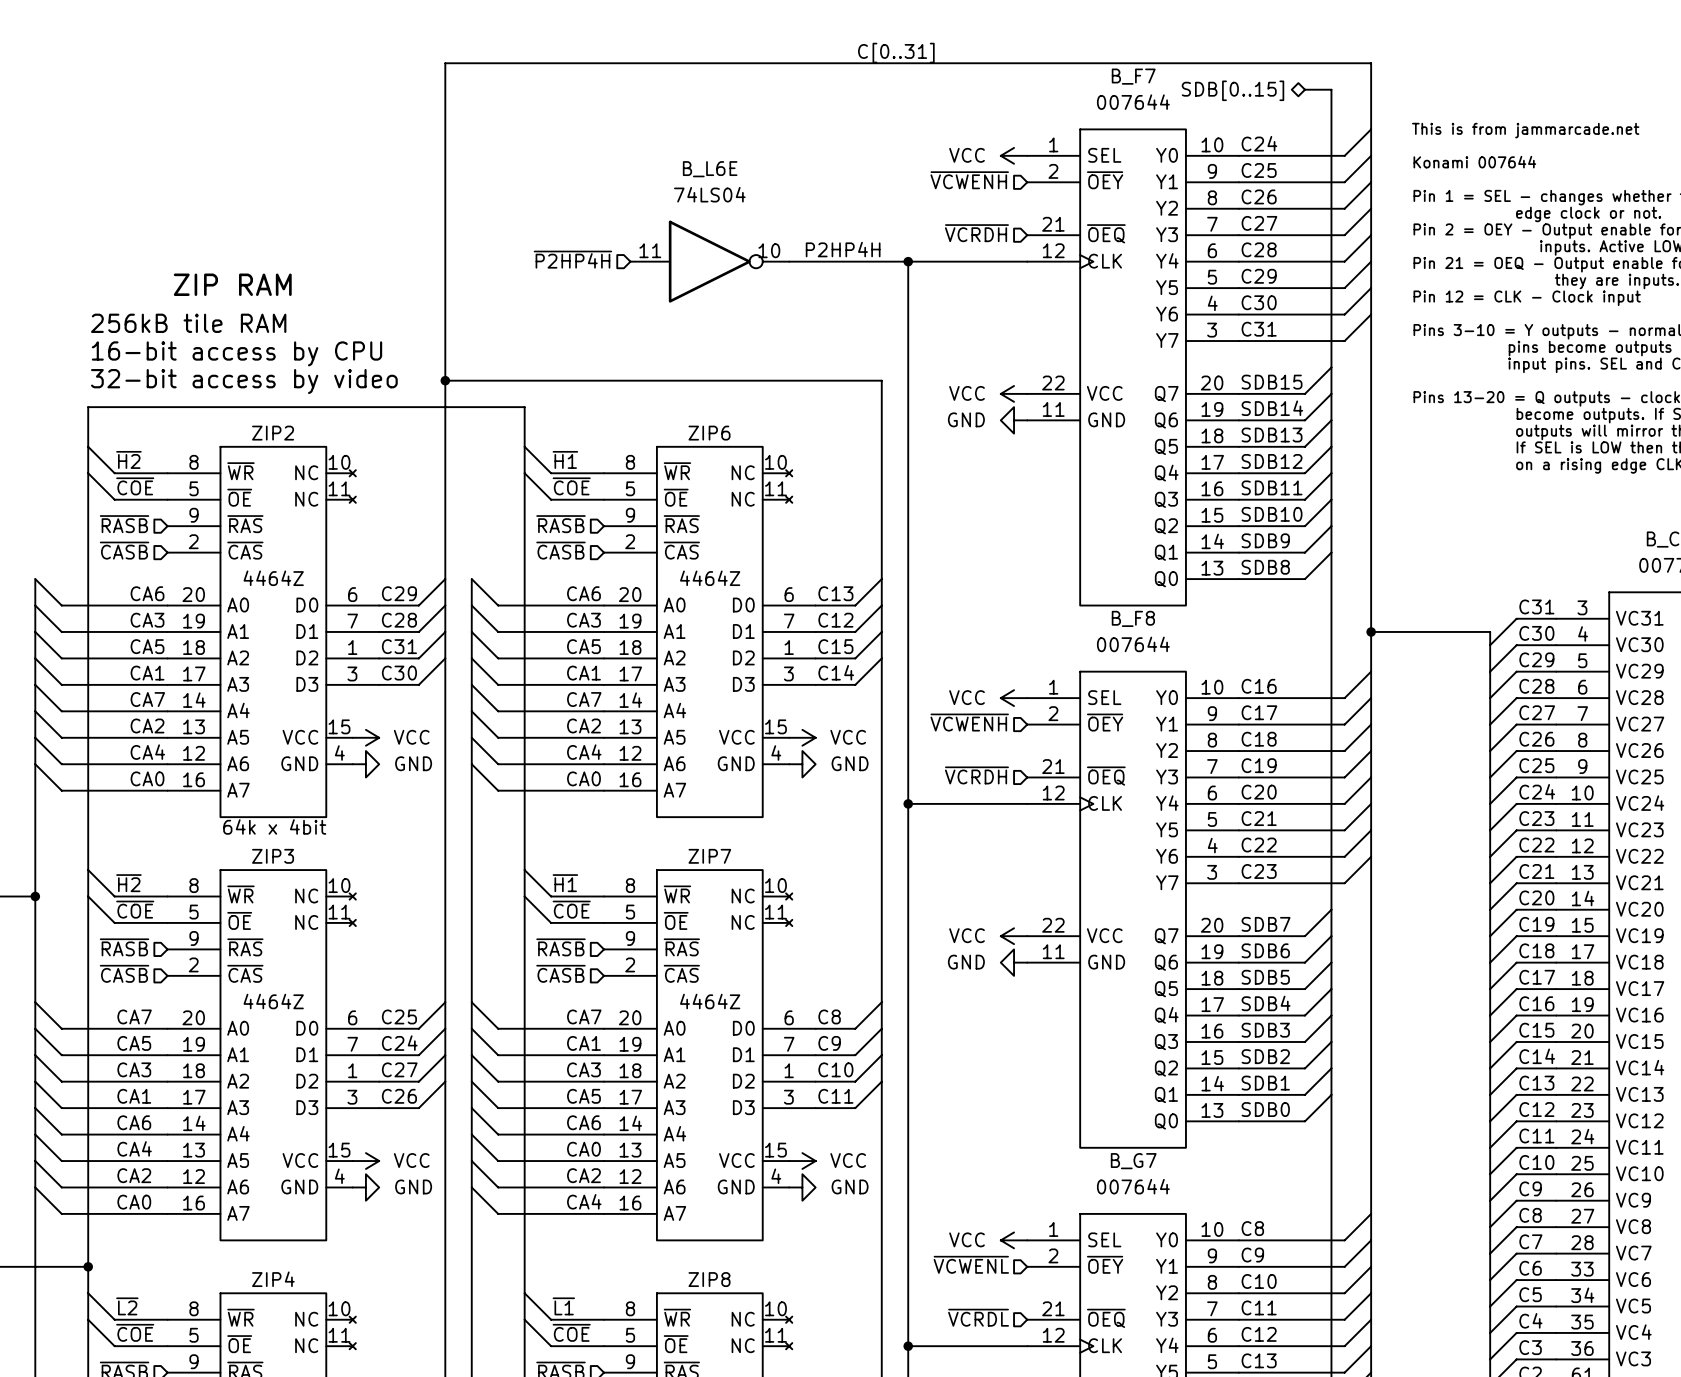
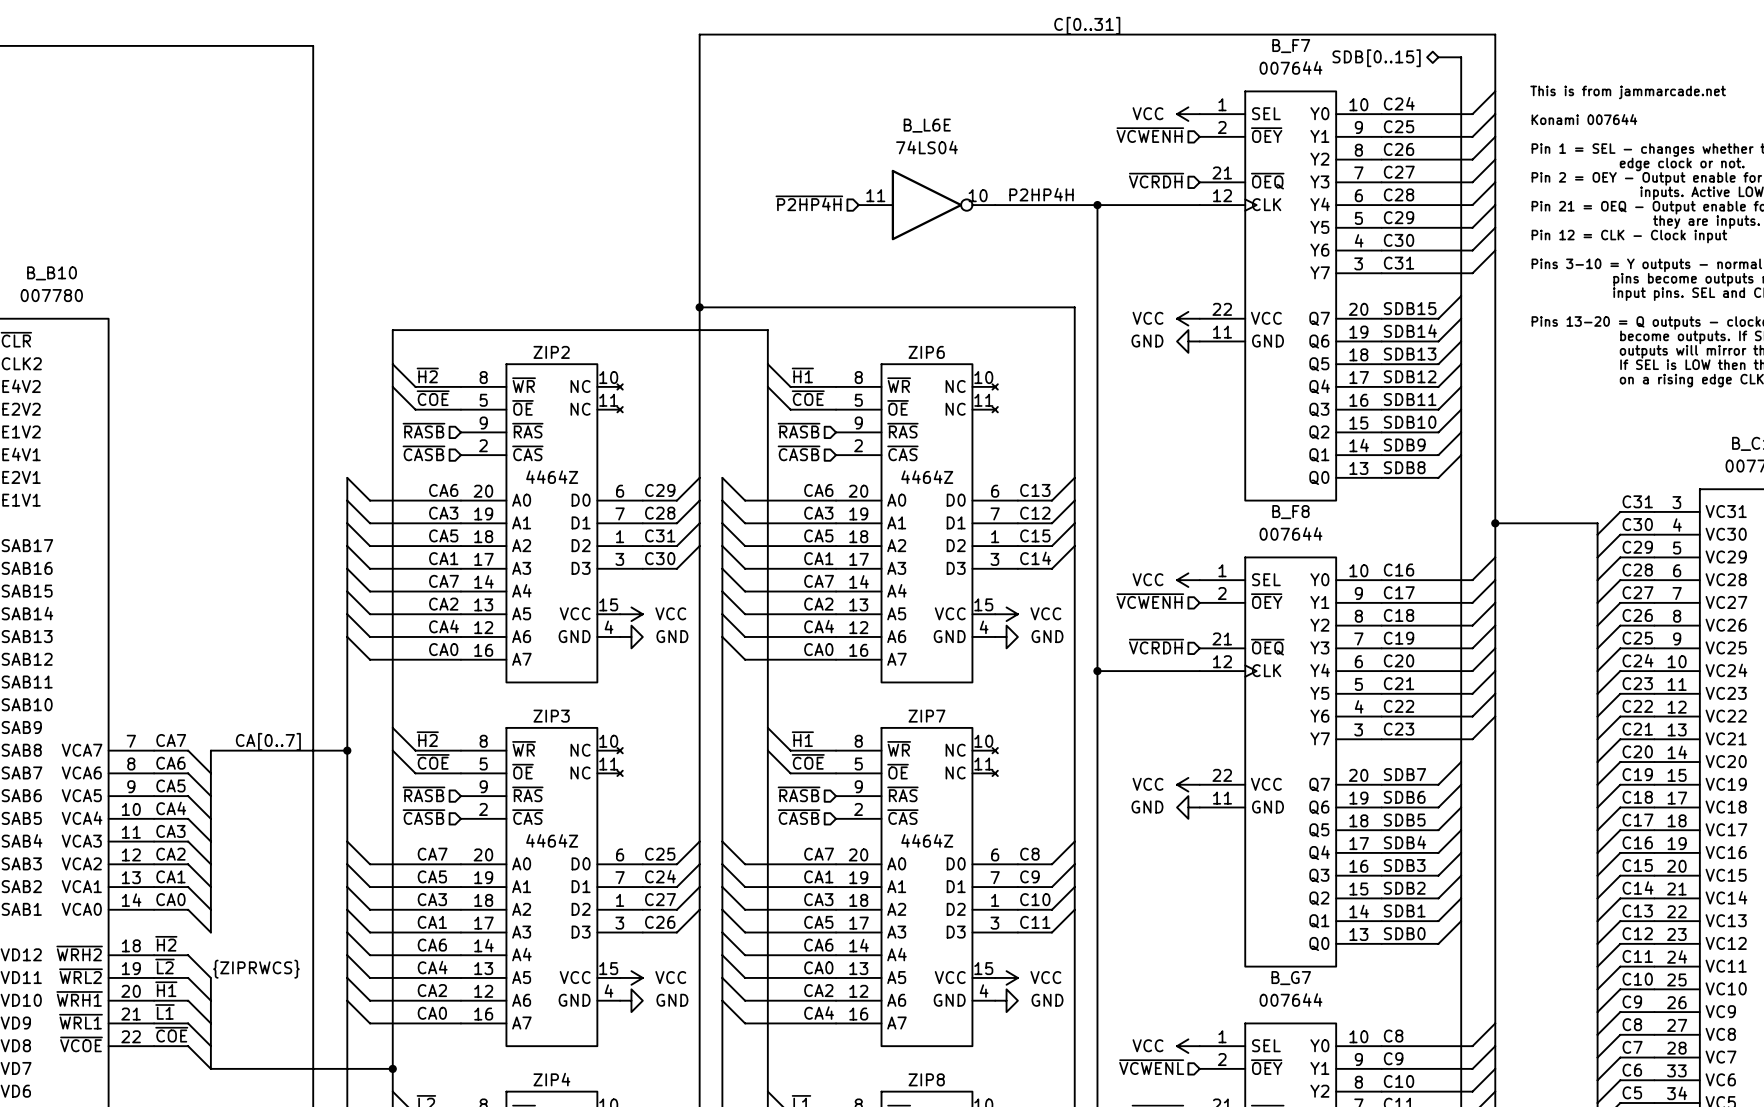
text: ZIP RAM (232, 284) -> none
text: 256kB tile RAM (188, 323) -> none
text: 16-bit access by CPU (237, 353) -> none
text: 32-bit access by video (244, 381) -> none
text: 64k x 4bit (274, 826) -> none

